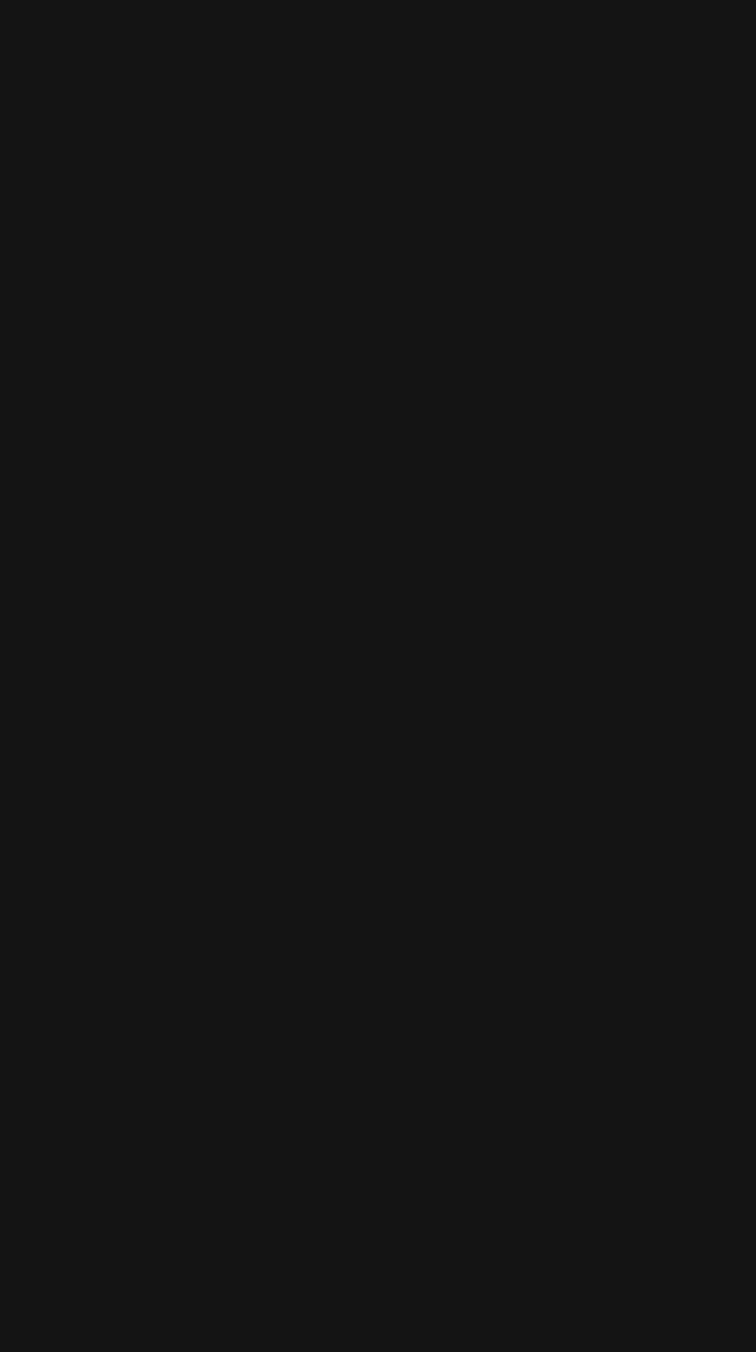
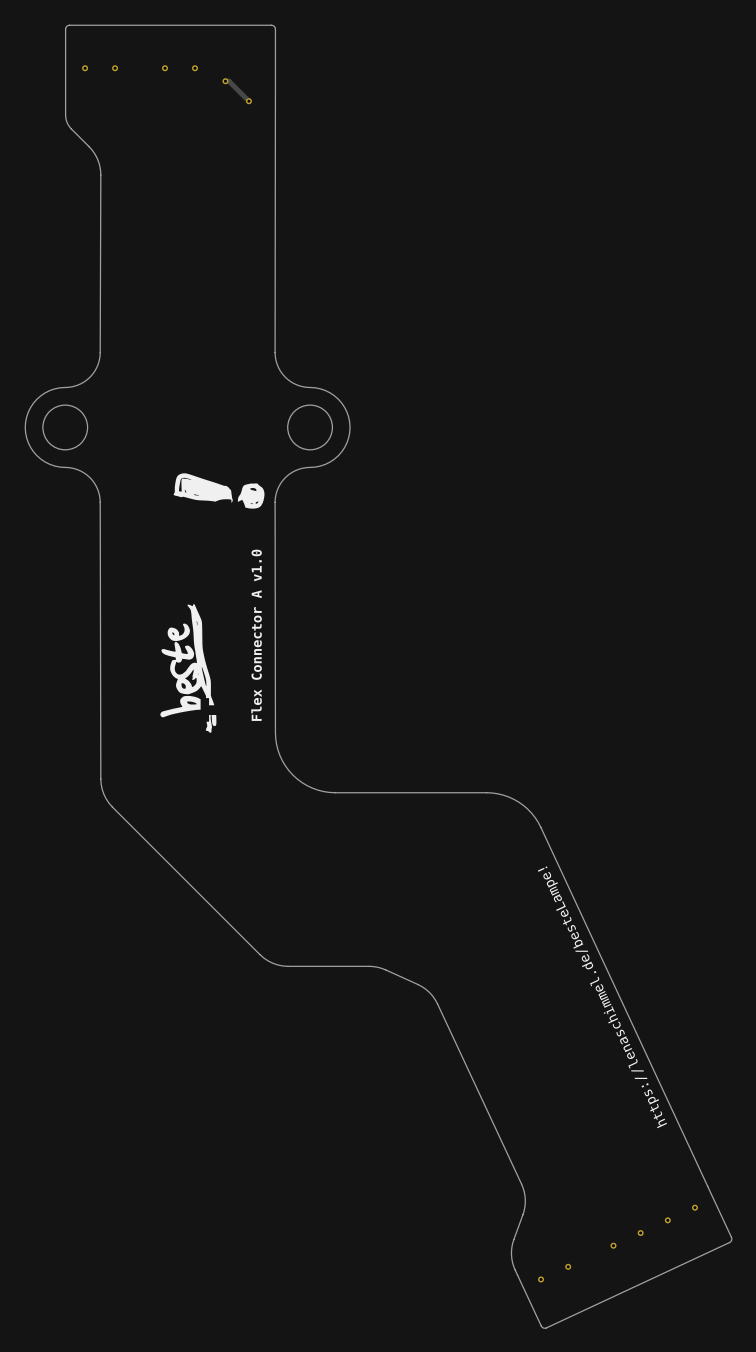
part: none -> (170, 55)
via: none -> (85, 68)
via: none -> (115, 68)
via: none -> (165, 68)
via: none -> (195, 68)
track: none -> (225, 81) (228, 81) (248, 101)
via: none -> (225, 81)
board edge: none -> (65, 85) (67, 122) (94, 152) (100, 171) (99, 356) (94, 371) (83, 382) (73, 386) (49, 390) (36, 399) (28, 412) (25, 427) (28, 442) (36, 455) (49, 464) (73, 468) (83, 472) (94, 483) (99, 494) (100, 778) (103, 794) (112, 807) (268, 960) (288, 966) (377, 967) (417, 984) (432, 995) (523, 1187) (524, 1207) (511, 1251) (512, 1262) (517, 1275)
board edge: none -> (275, 85) (275, 360) (282, 374) (291, 382) (302, 386) (325, 390) (338, 399) (346, 412) (350, 427) (346, 442) (338, 455) (325, 464) (302, 468) (291, 472) (282, 480) (275, 494) (275, 732) (280, 755) (285, 766) (297, 779) (312, 788) (323, 791) (492, 792) (508, 796) (527, 809) (540, 827) (707, 1186)
via: none -> (248, 101)
round board edge: none -> [42, 404, 88, 451]
round board edge: none -> [287, 404, 333, 451]
drawing: none -> [160, 473, 265, 733]
text: none -> Flex Connector A v1.0 (256, 635)
text: none -> https://lenaschimmel.de/besteLampe! (602, 997)
via: none -> (695, 1207)
via: none -> (667, 1220)
via: none -> (640, 1233)
via: none -> (613, 1245)
part: none -> (624, 1257)
via: none -> (568, 1266)
via: none -> (541, 1279)

